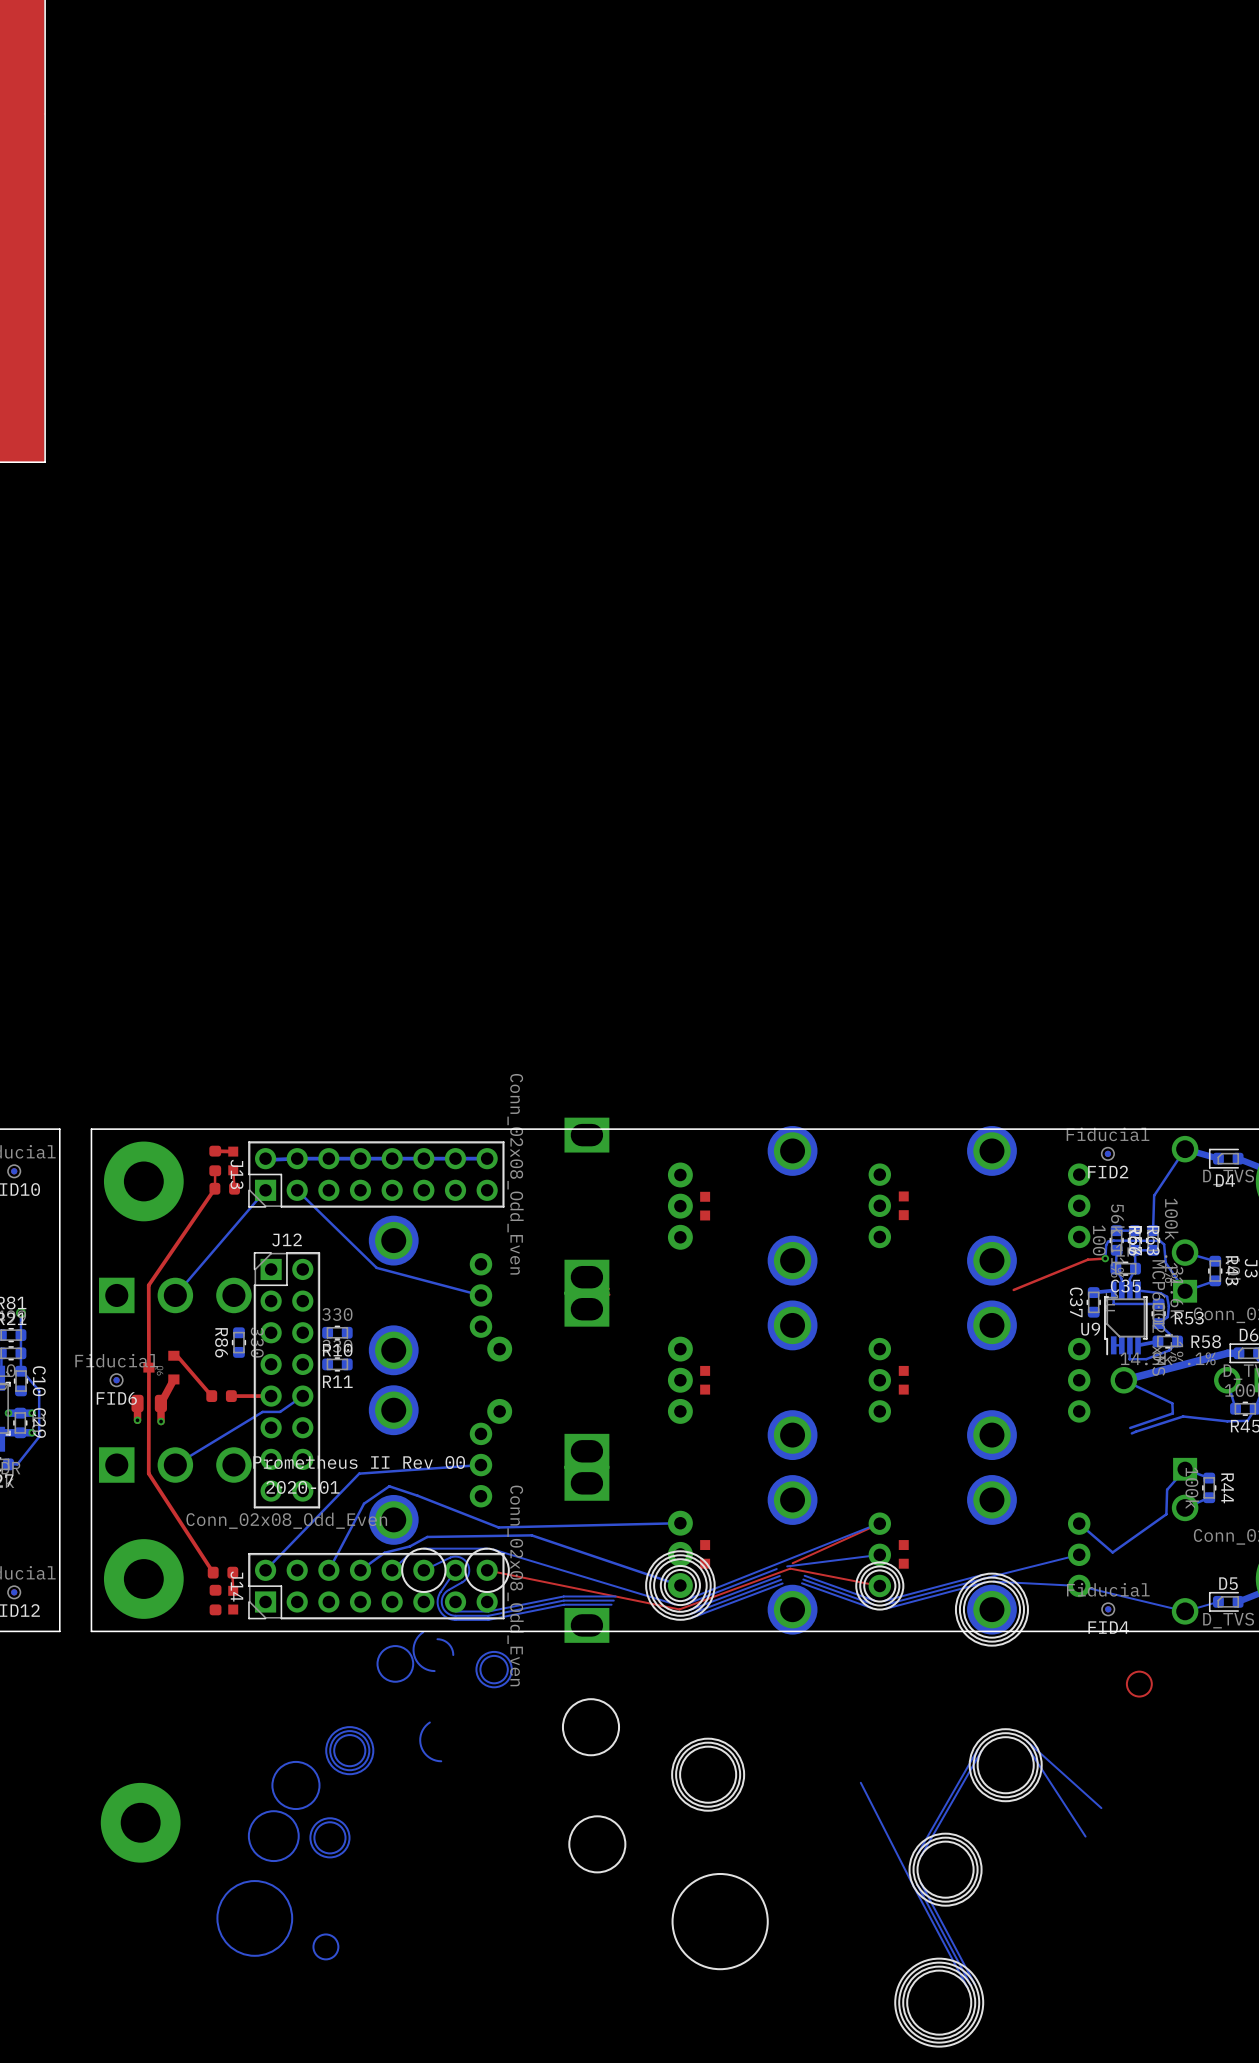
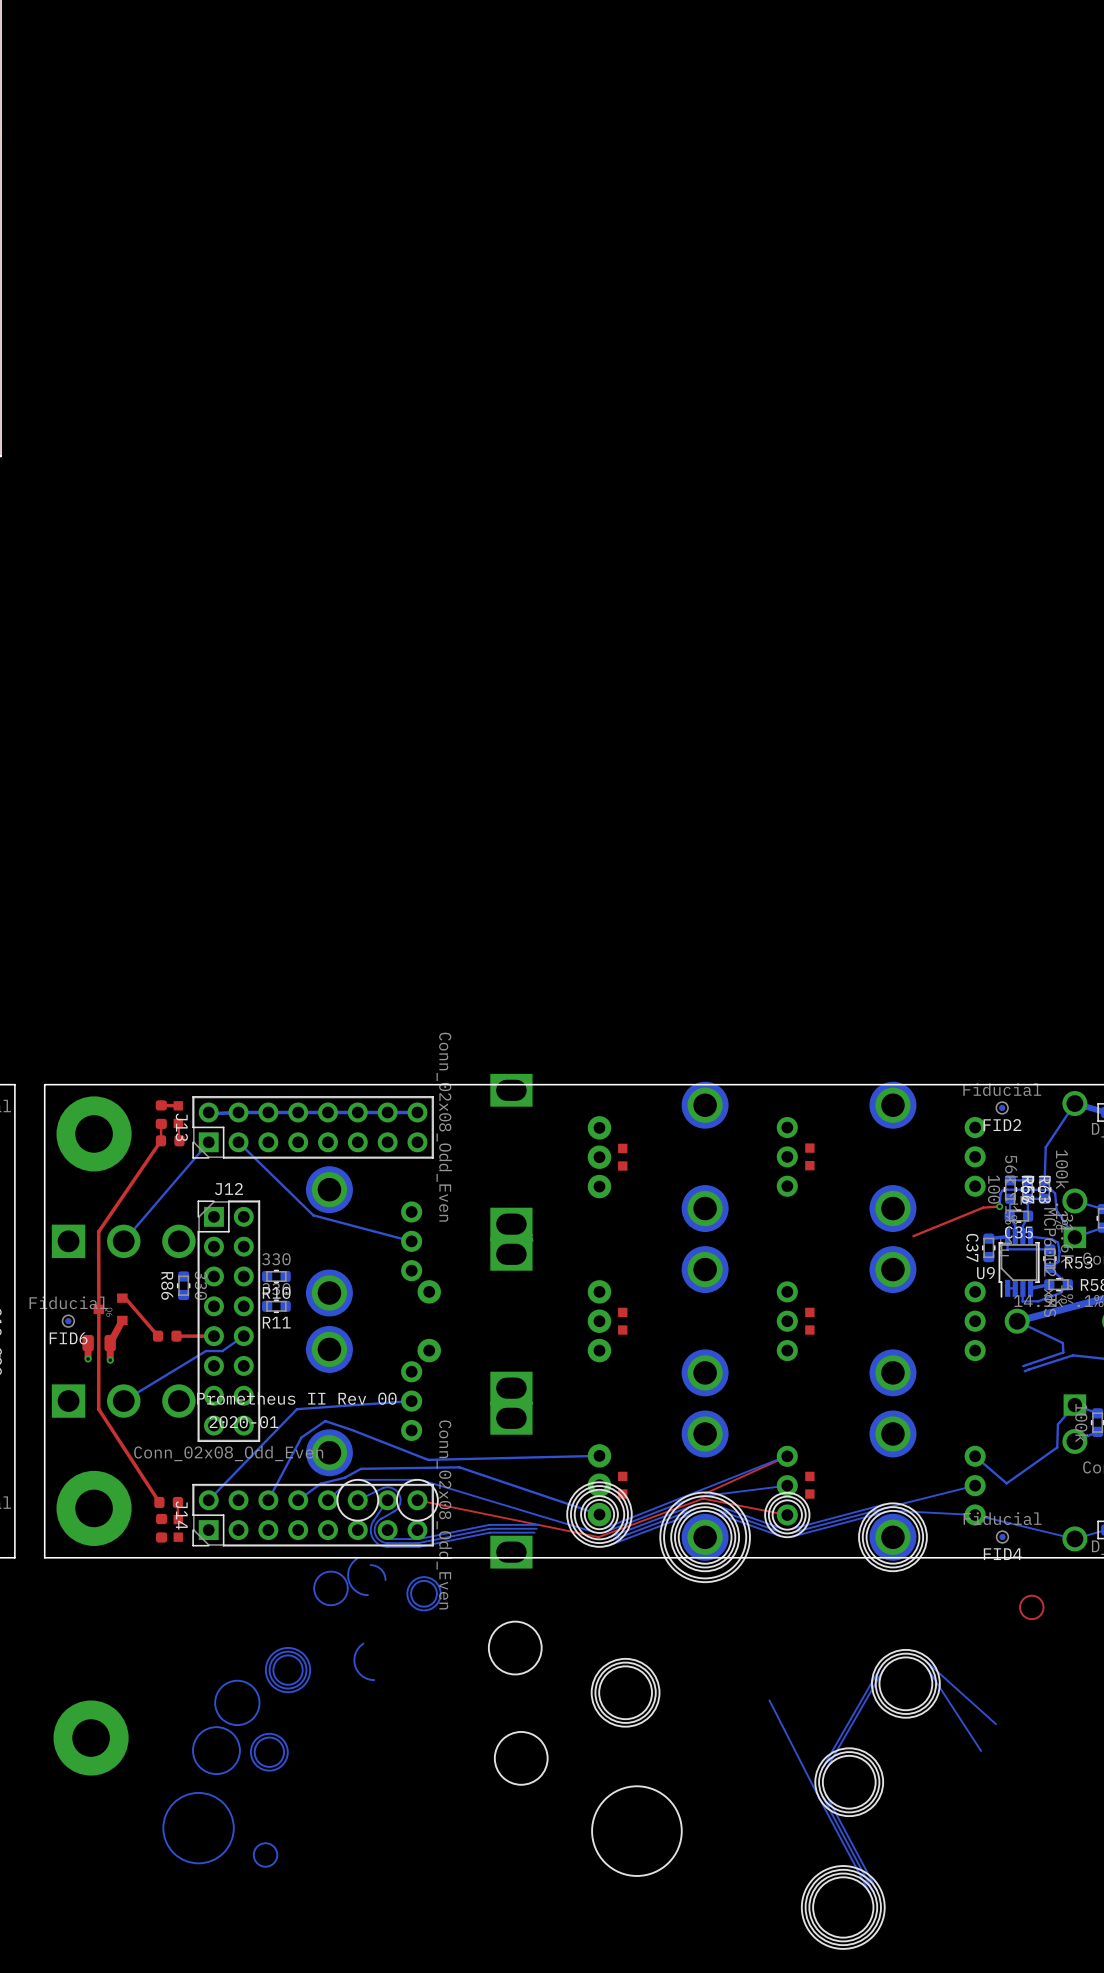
drawing: none -> [659, 1491, 751, 1584]

